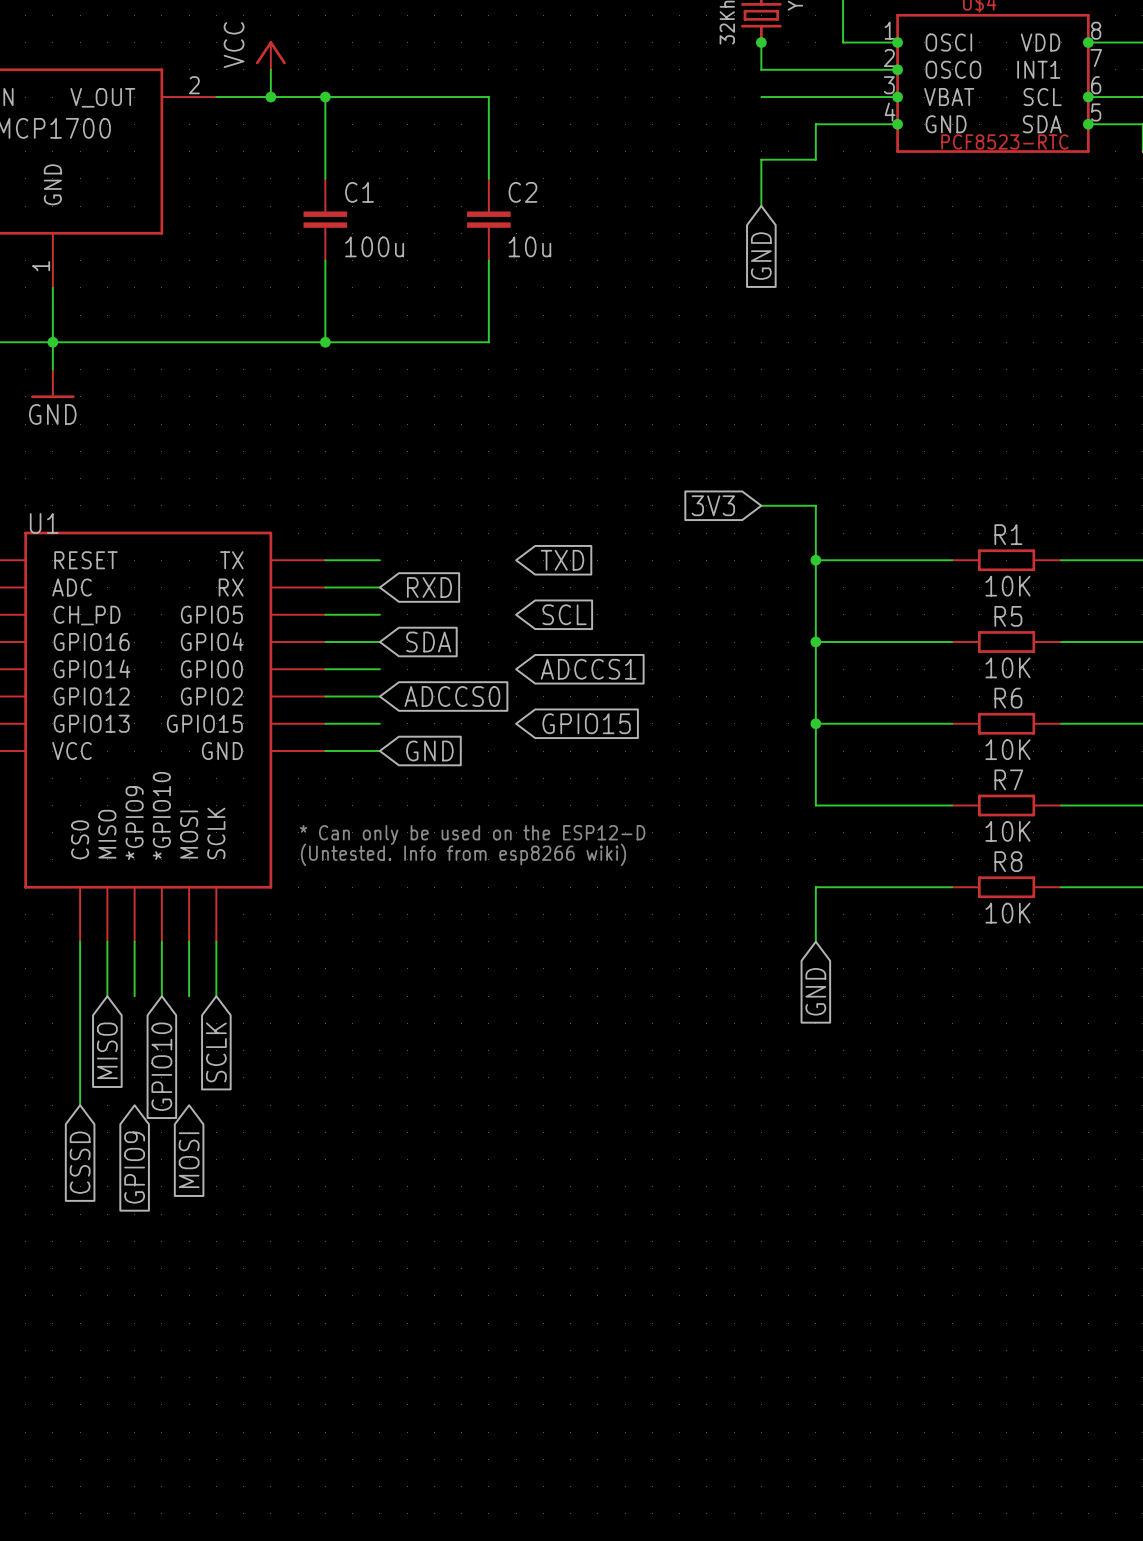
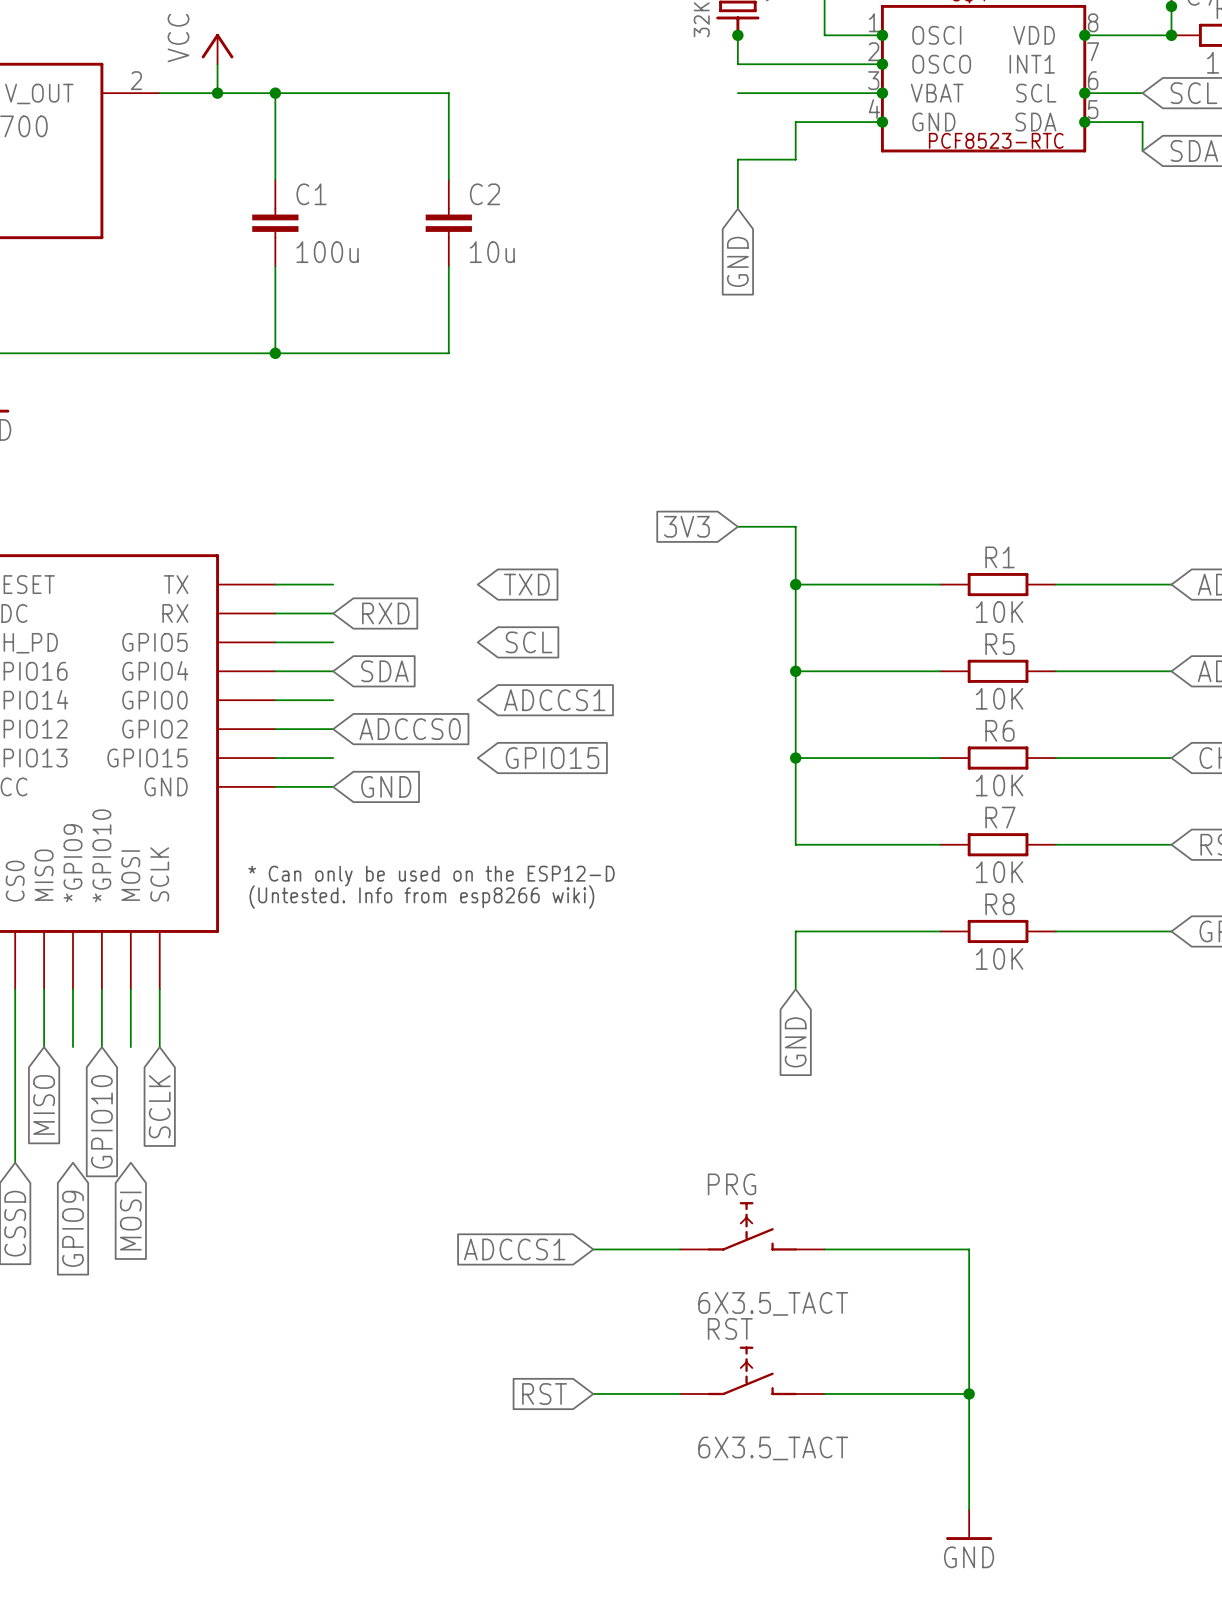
PRG: none -> 6X3.5_TACT (752, 1226)
global label: none -> ADCCS1 (514, 1249)
wire: none -> (593, 1249) (680, 1249)
wire: none -> (824, 1249) (969, 1249) (969, 1509)
RST: none -> 6X3.5_TACT (752, 1370)
global label: none -> RST (544, 1394)
wire: none -> (593, 1394) (680, 1394)
wire: none -> (824, 1394) (969, 1394)
junction: none -> (969, 1394)
power symbol: none -> GND (969, 1524)

